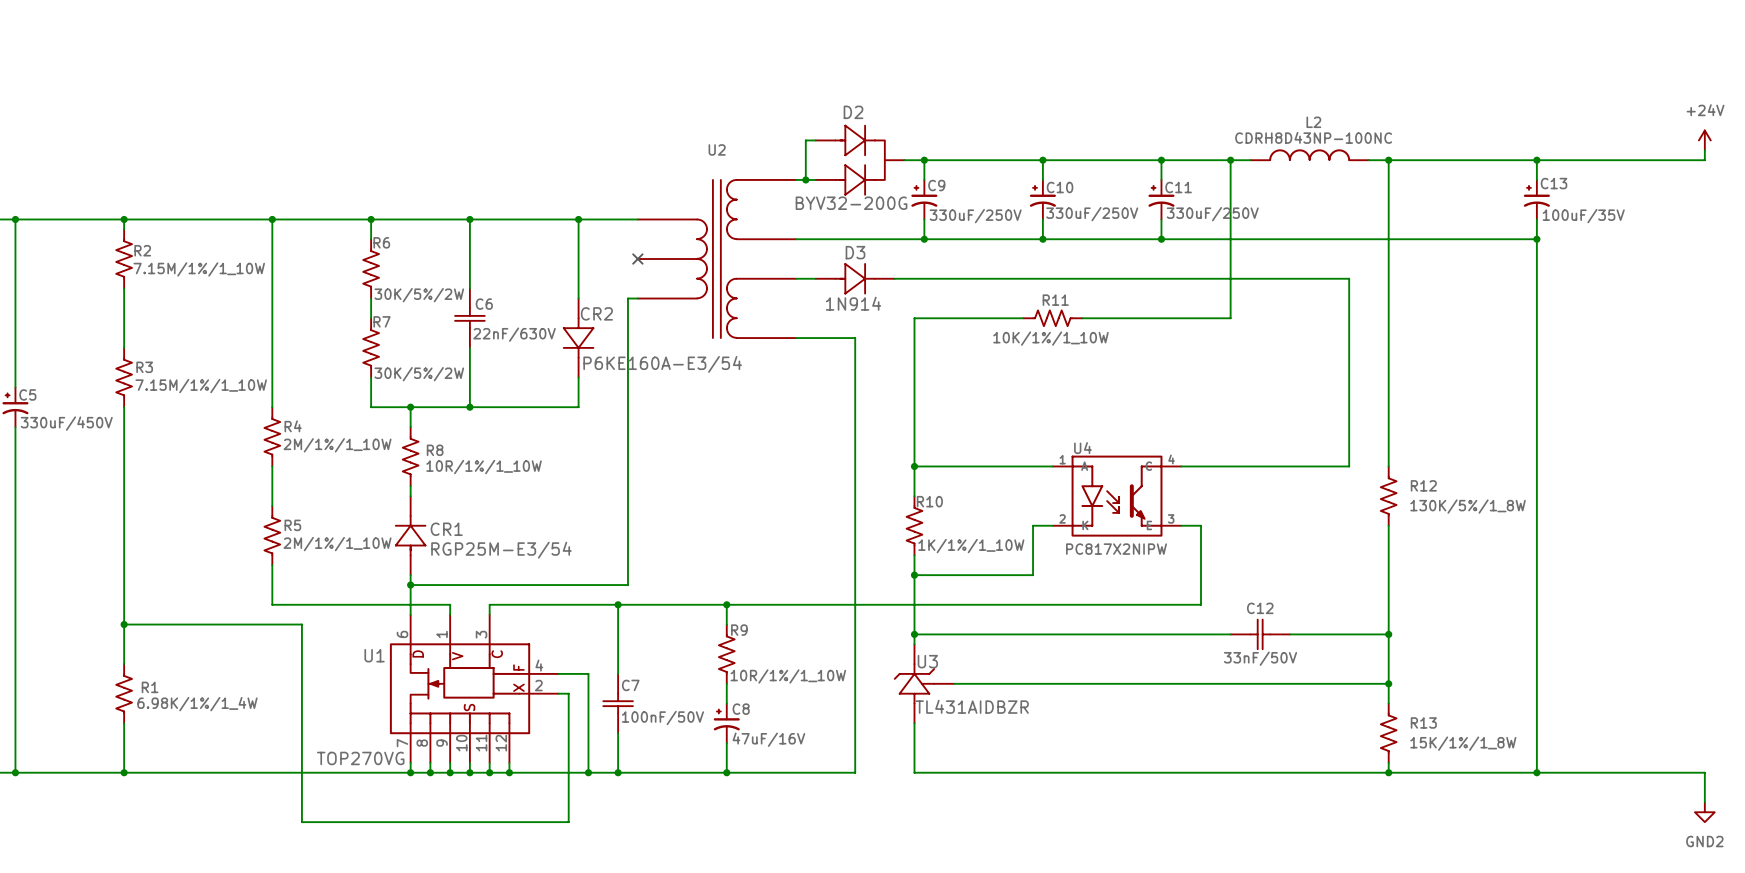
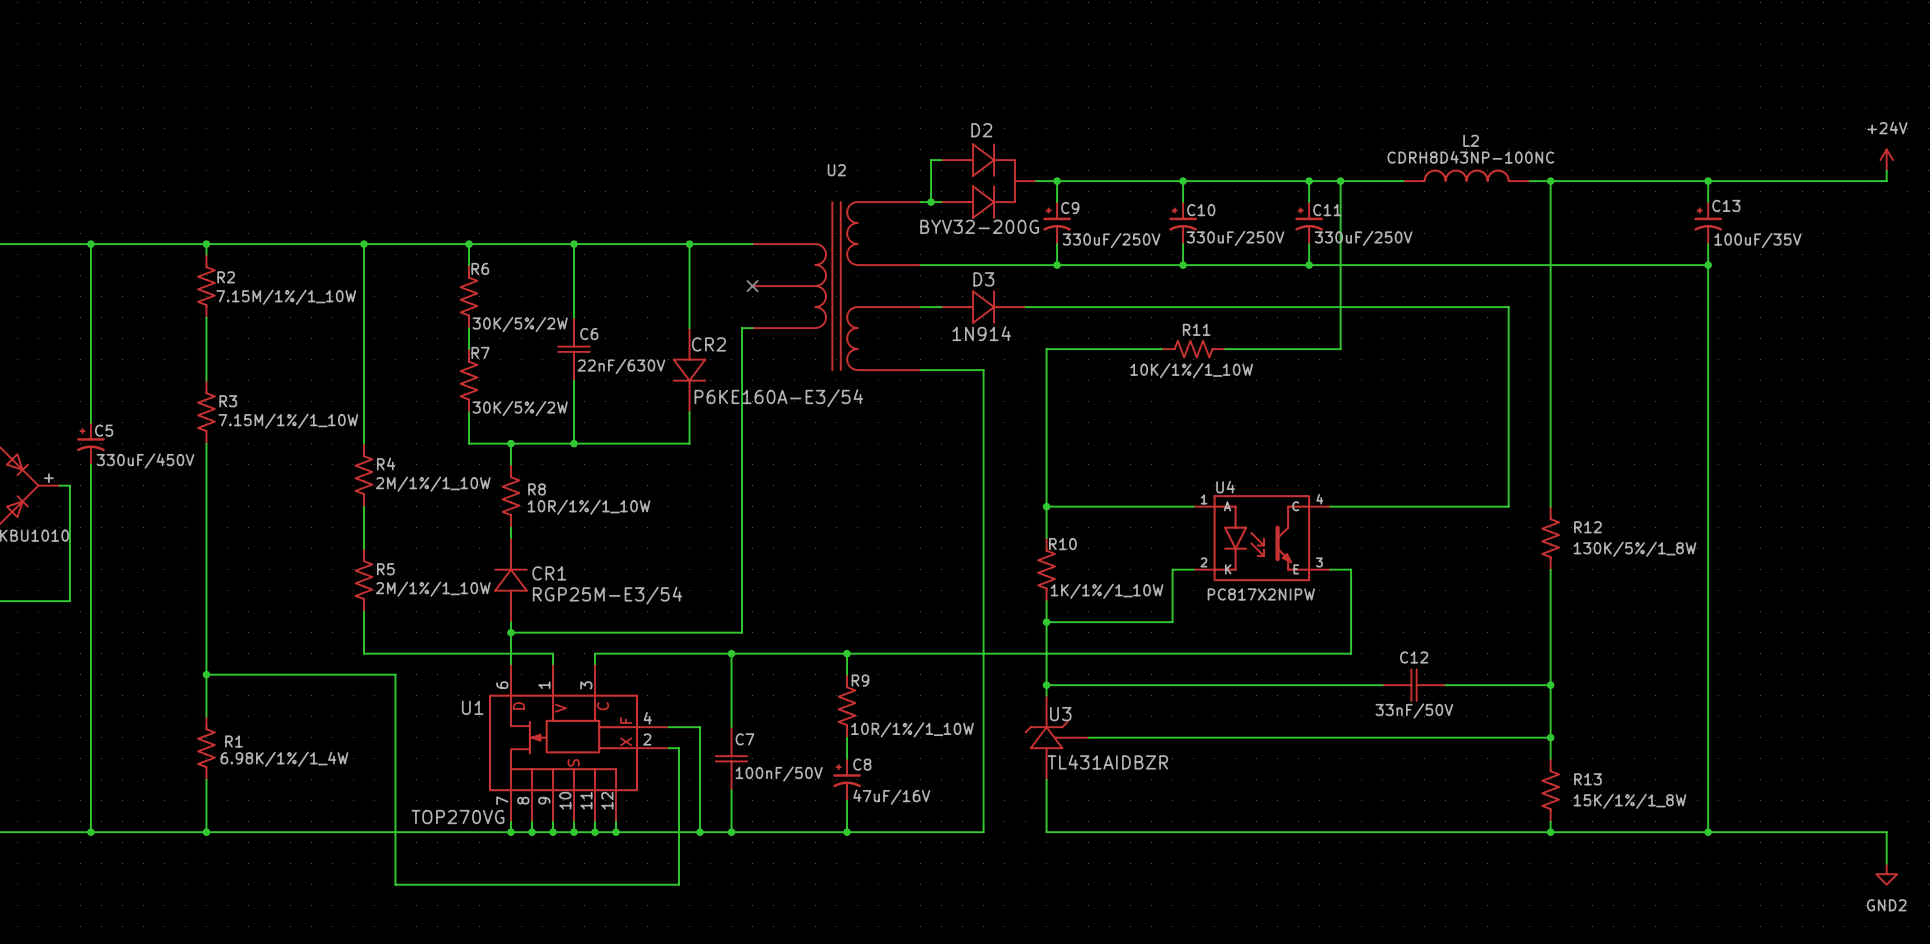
wire: (1230, 160) (1230, 318) (1191, 318) -> (1340, 181) (1340, 349)
junction position: (1230, 160) -> (1340, 181)

